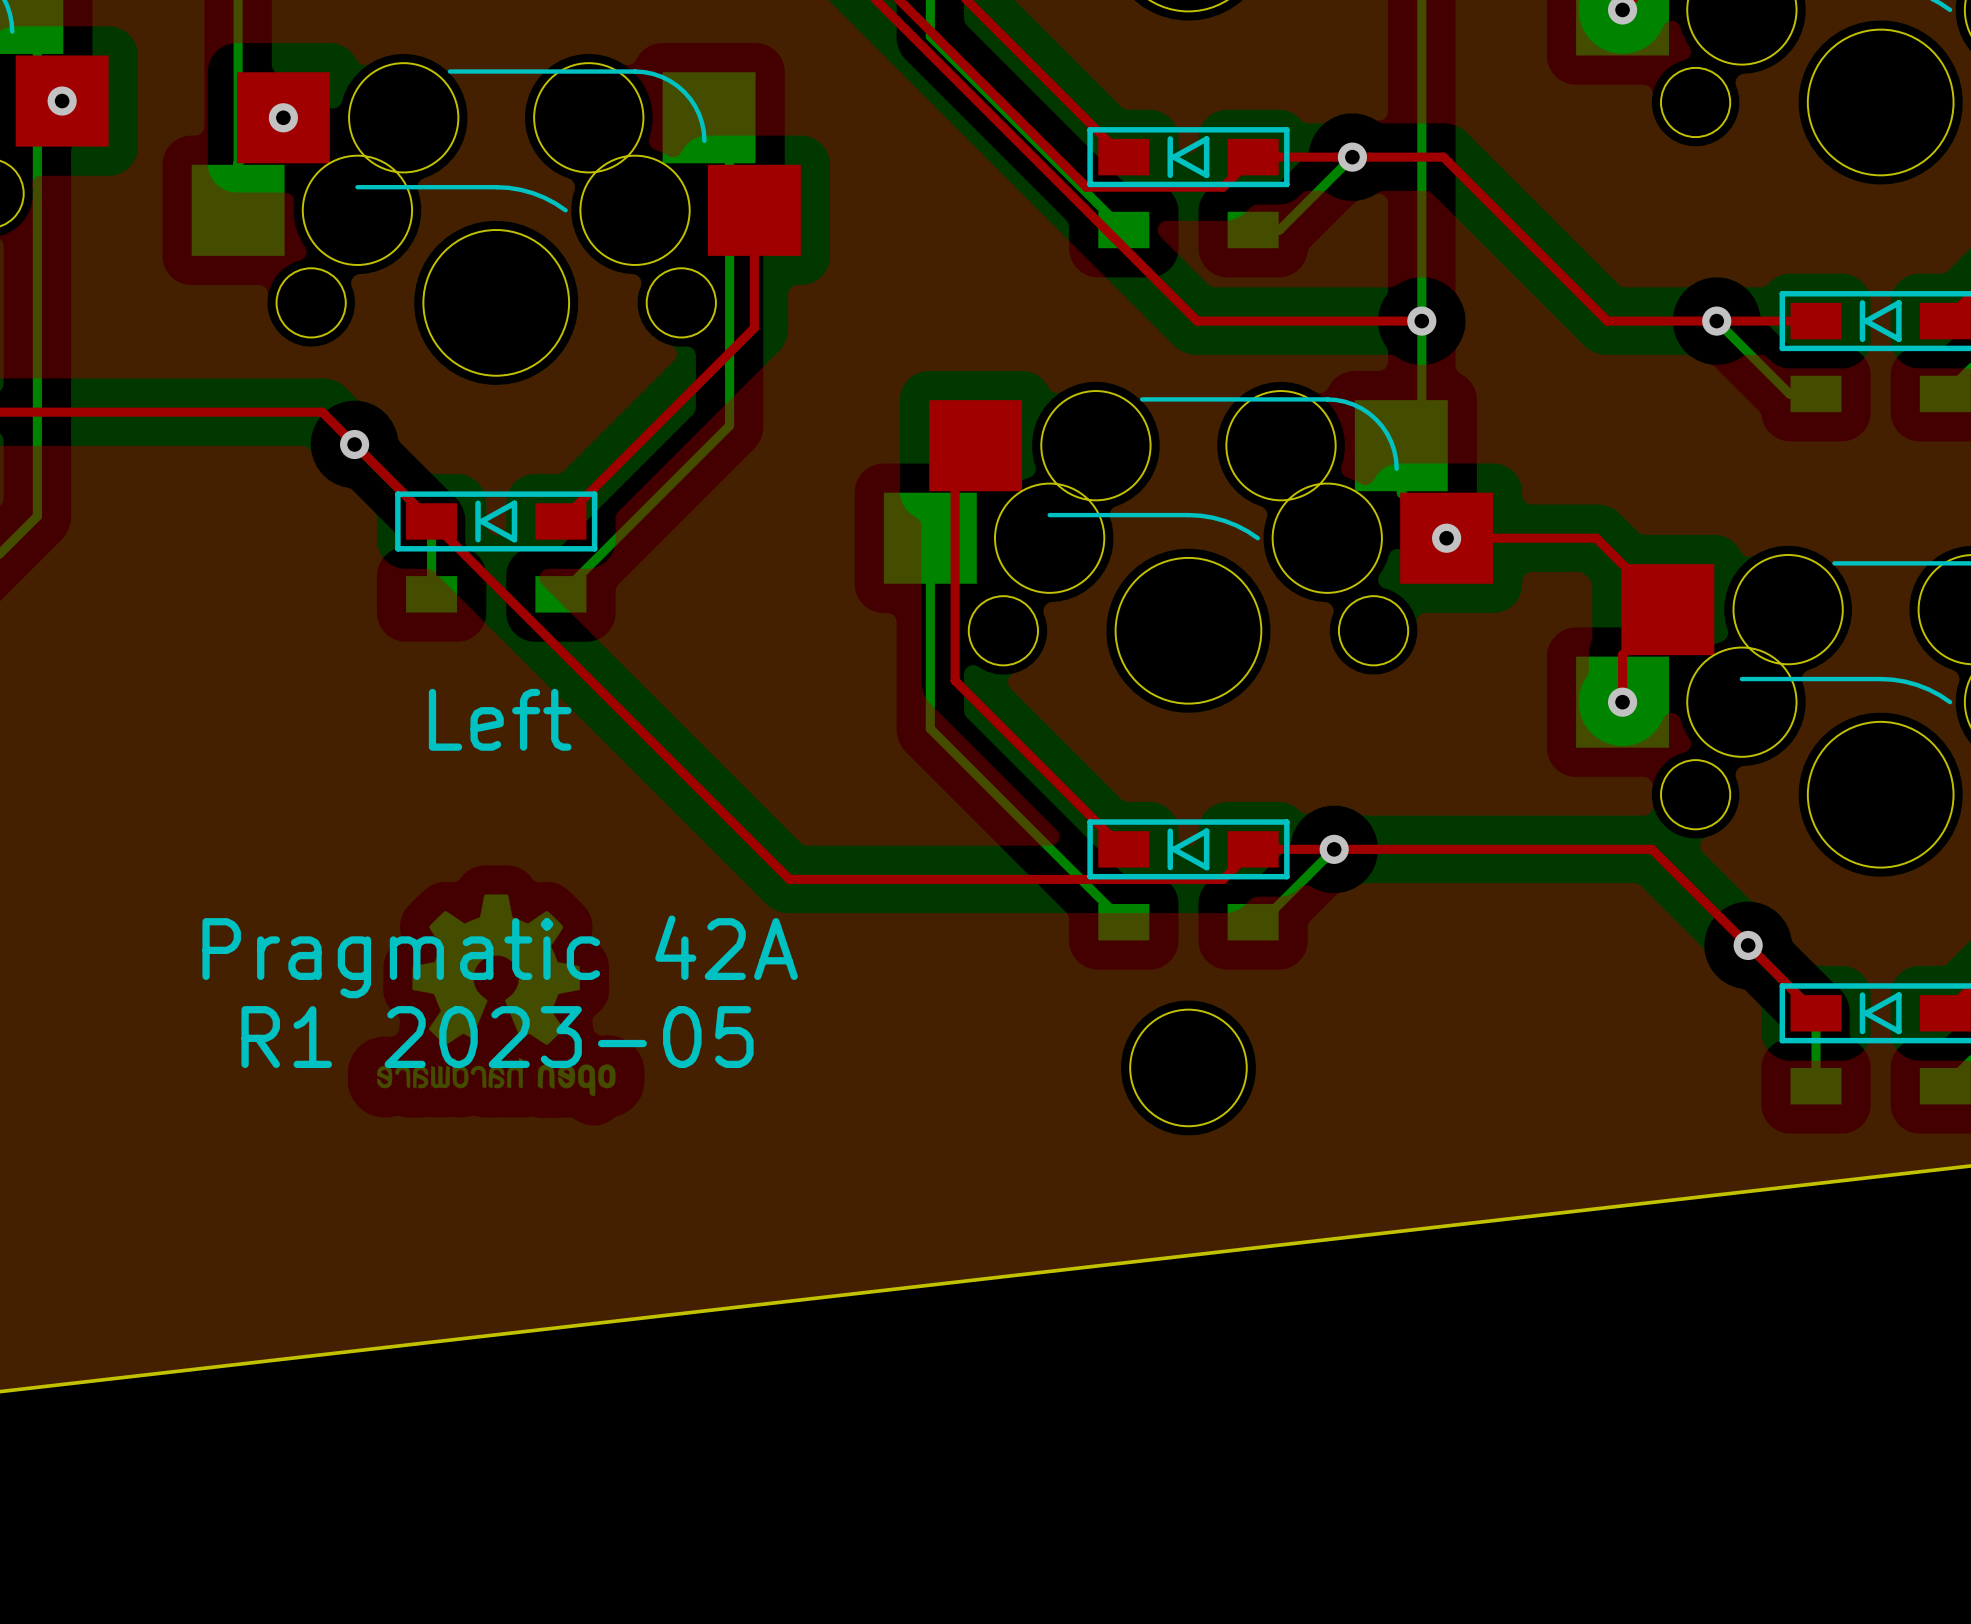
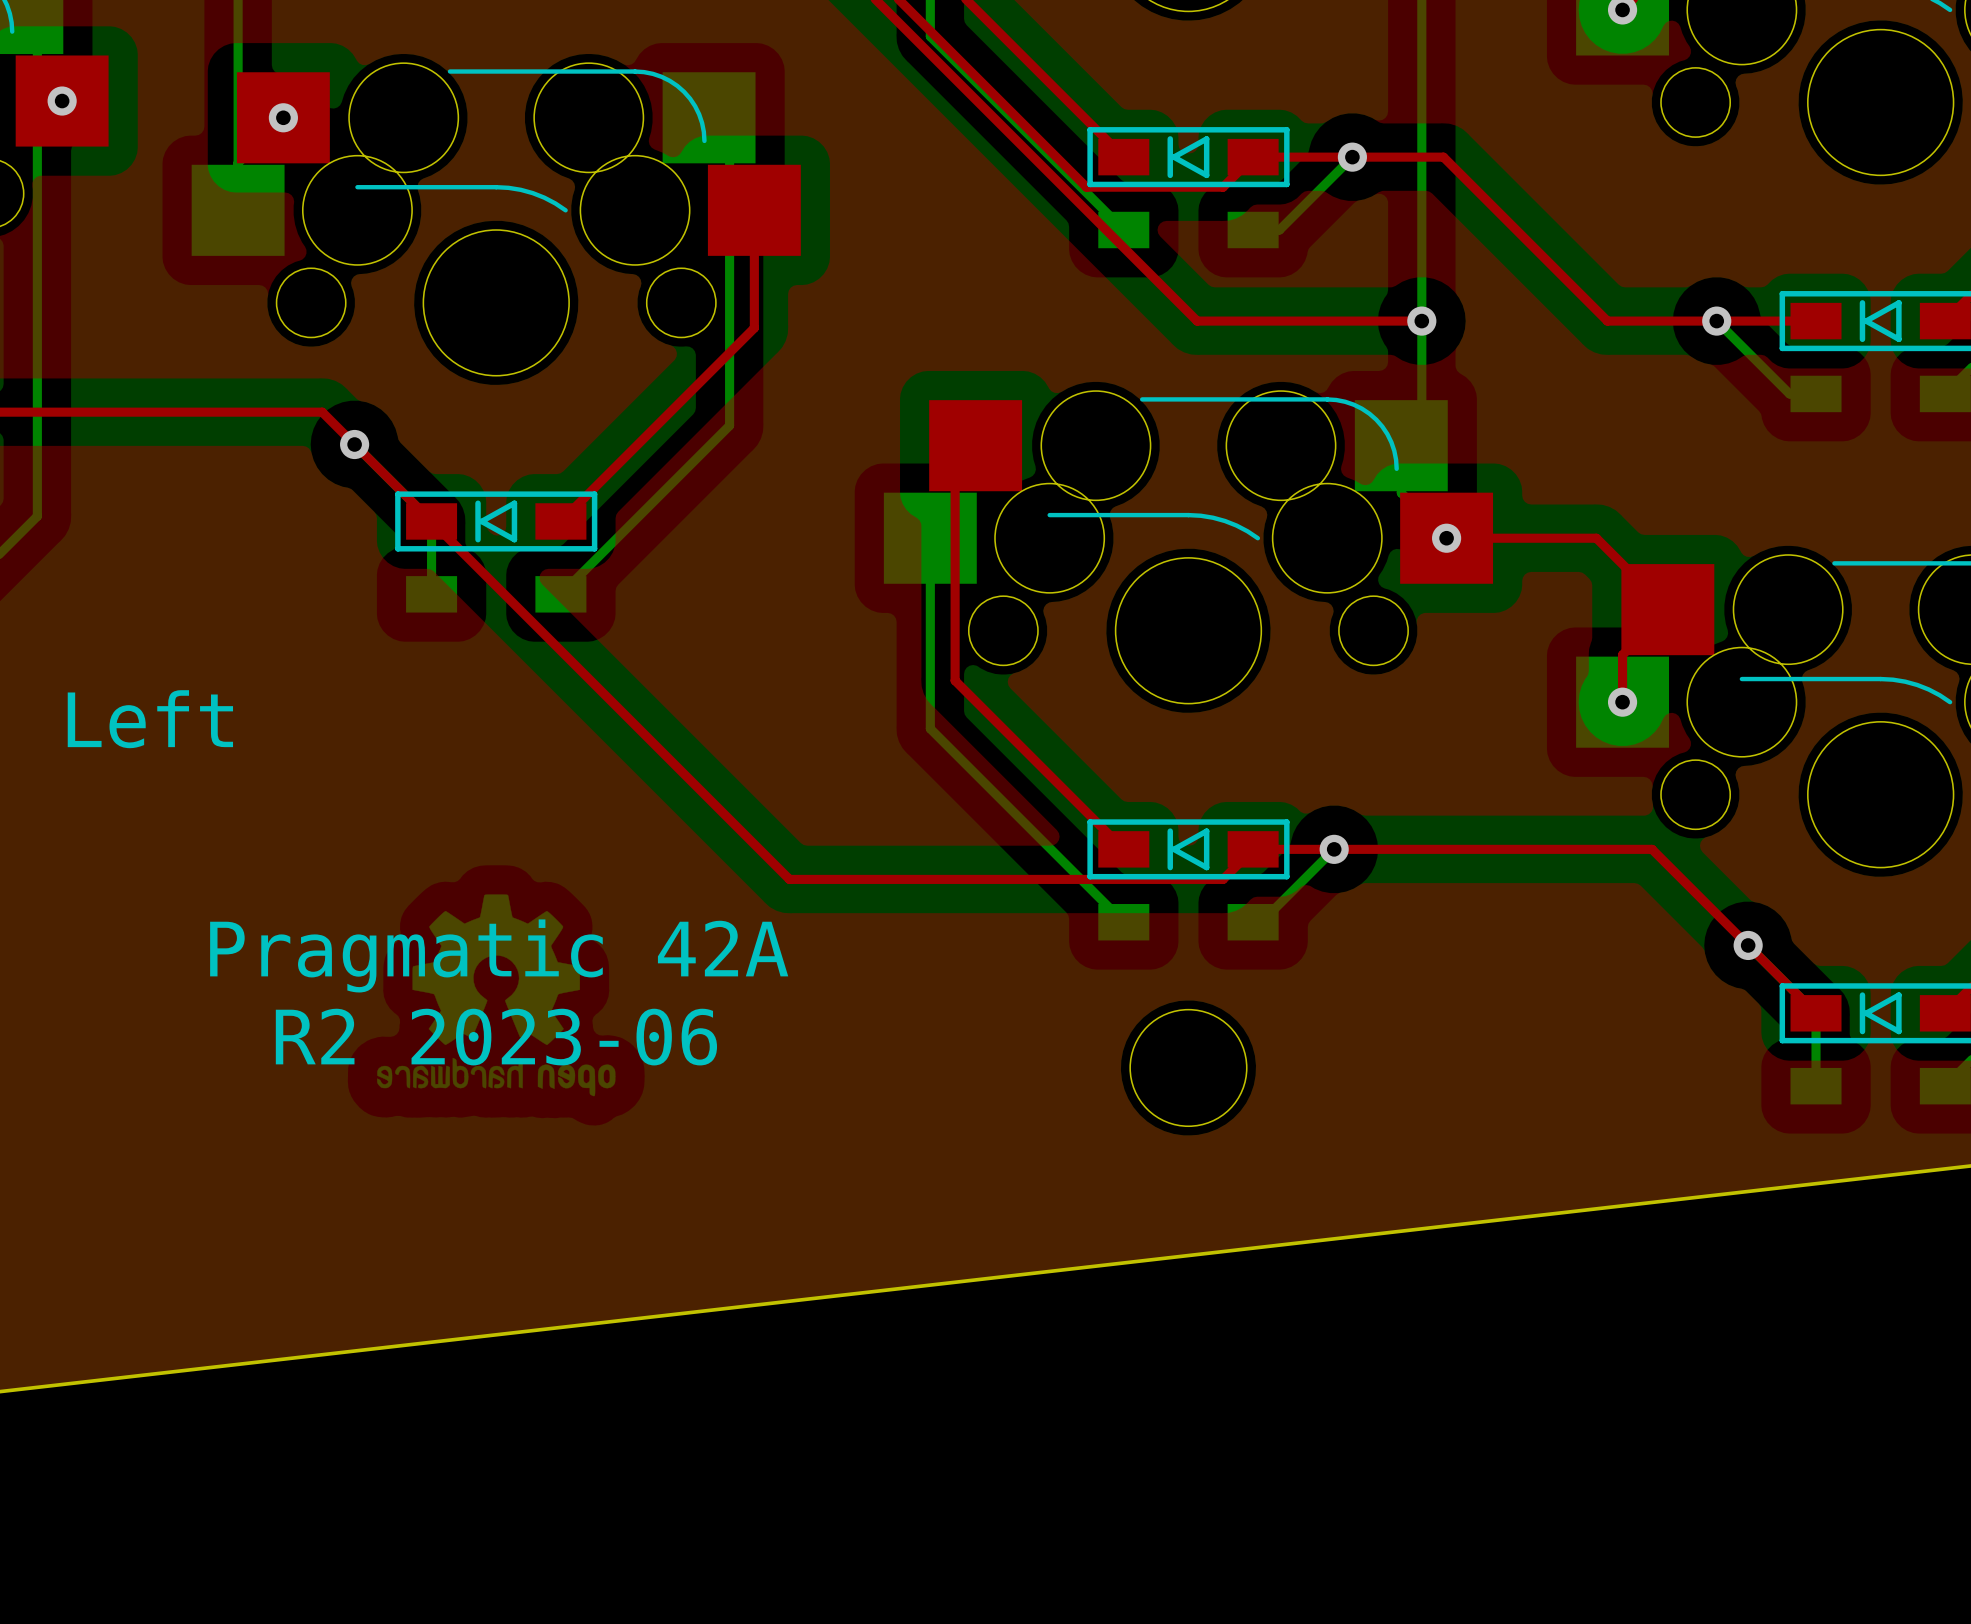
text position: Left (500, 719) -> Left (150, 719)
text: R1 2023-05 (497, 1037) -> R2 2023-06 (496, 1037)

